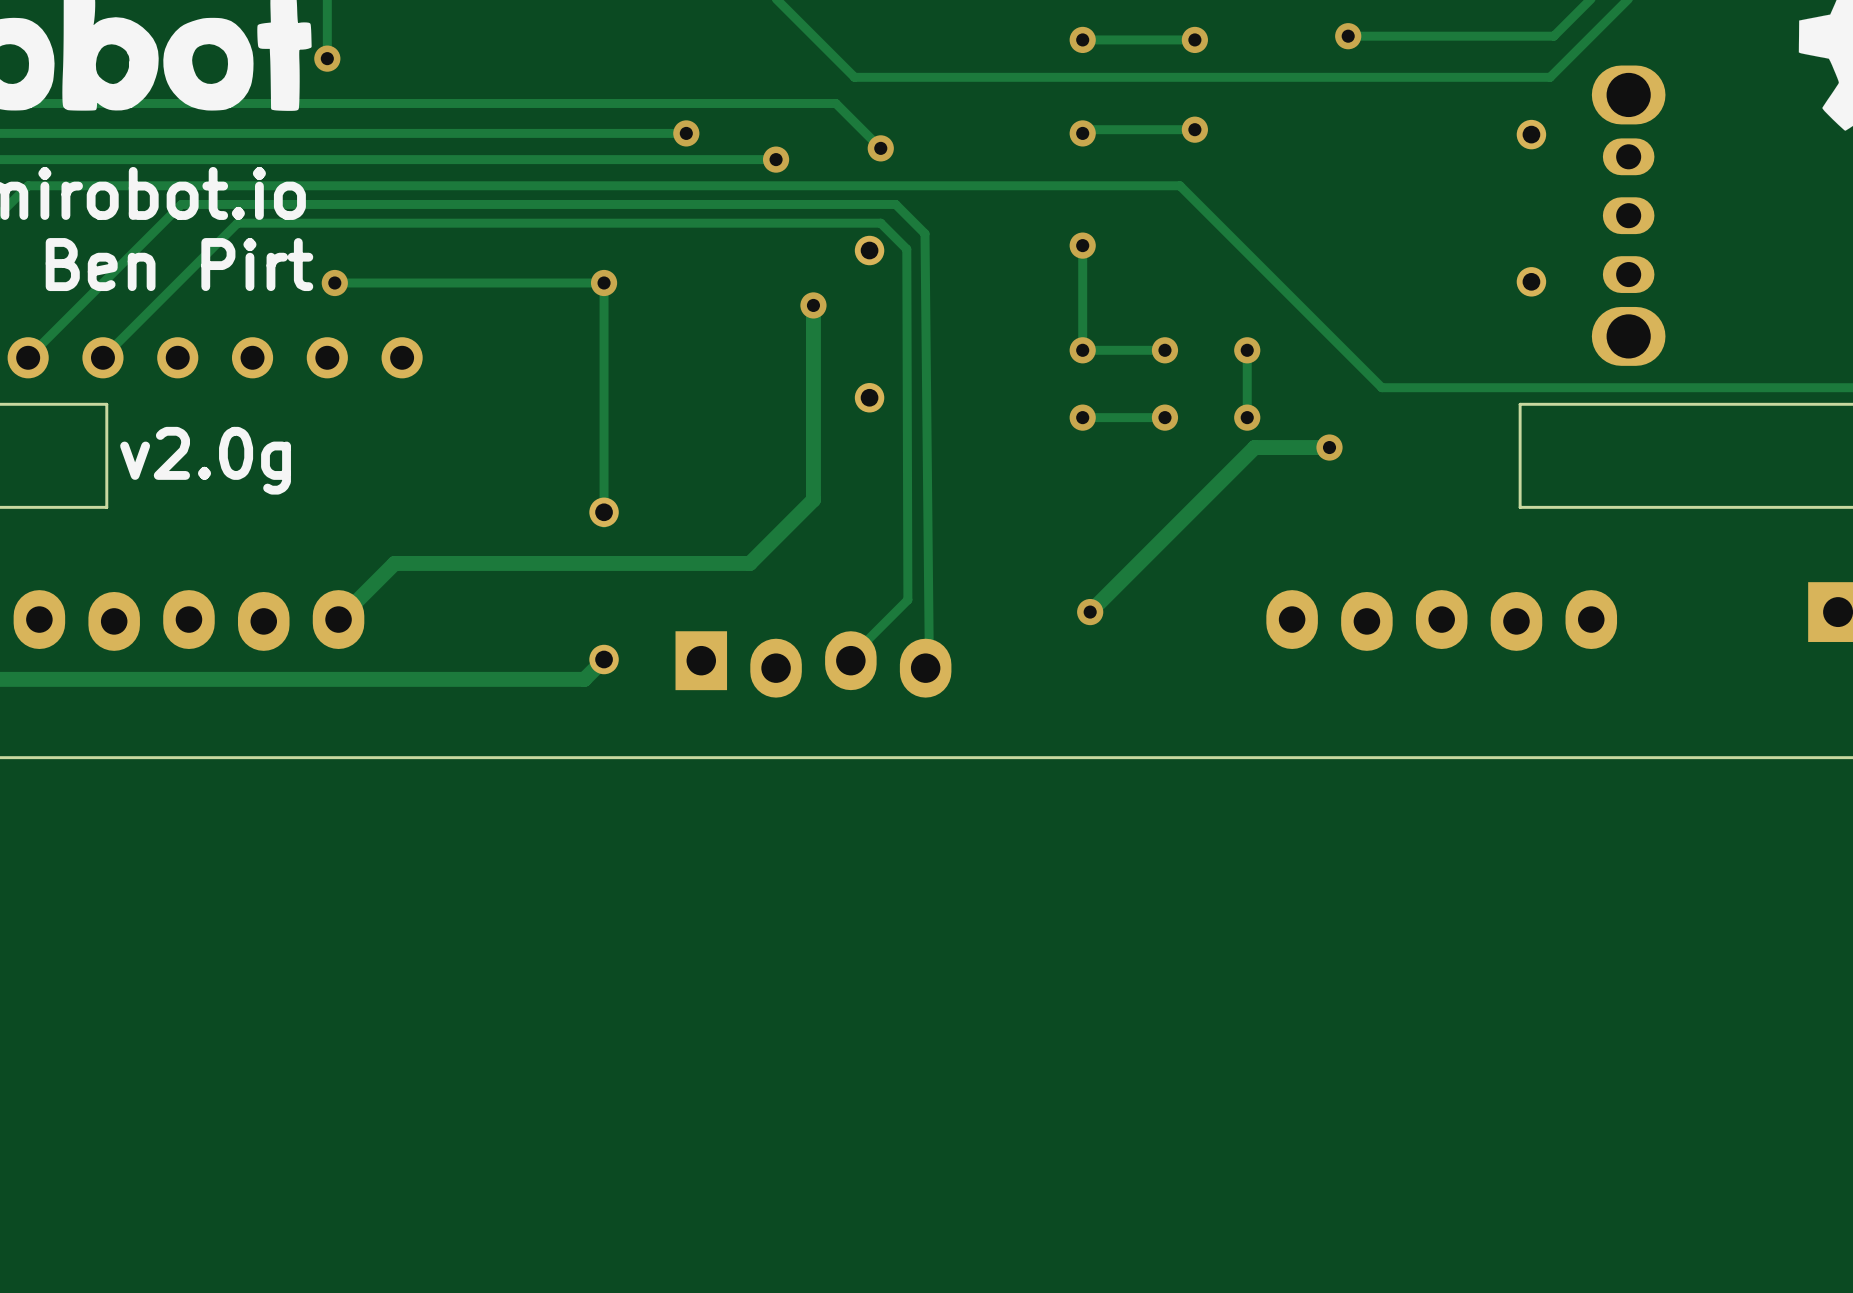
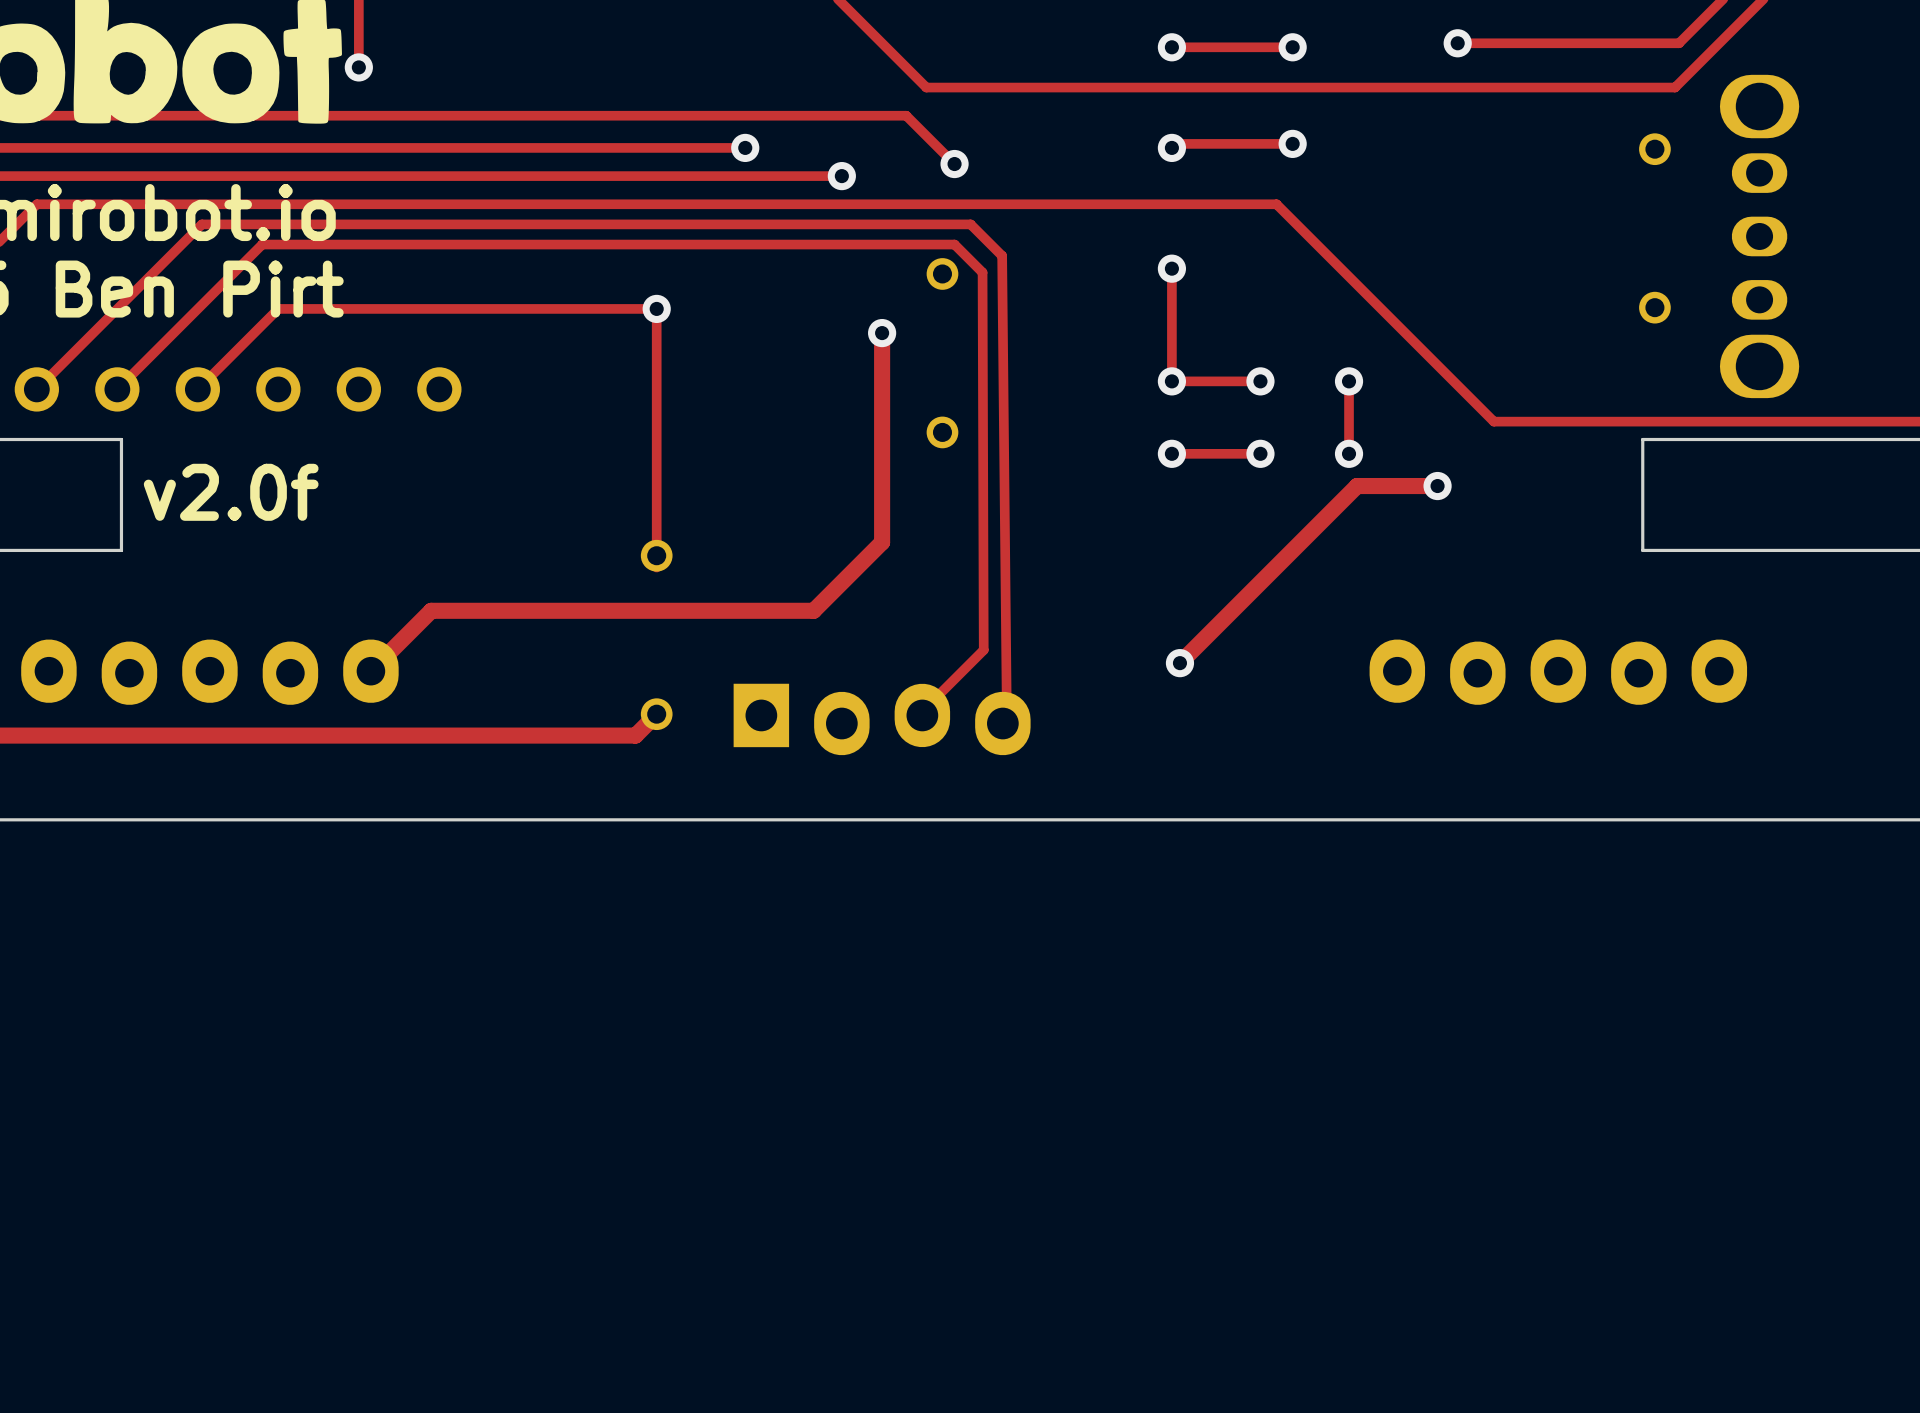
track: none -> (366, 308) (278, 308) (197, 389)
via: (334, 283) -> none
text: v2.0g (205, 460) -> v2.0f (231, 492)

